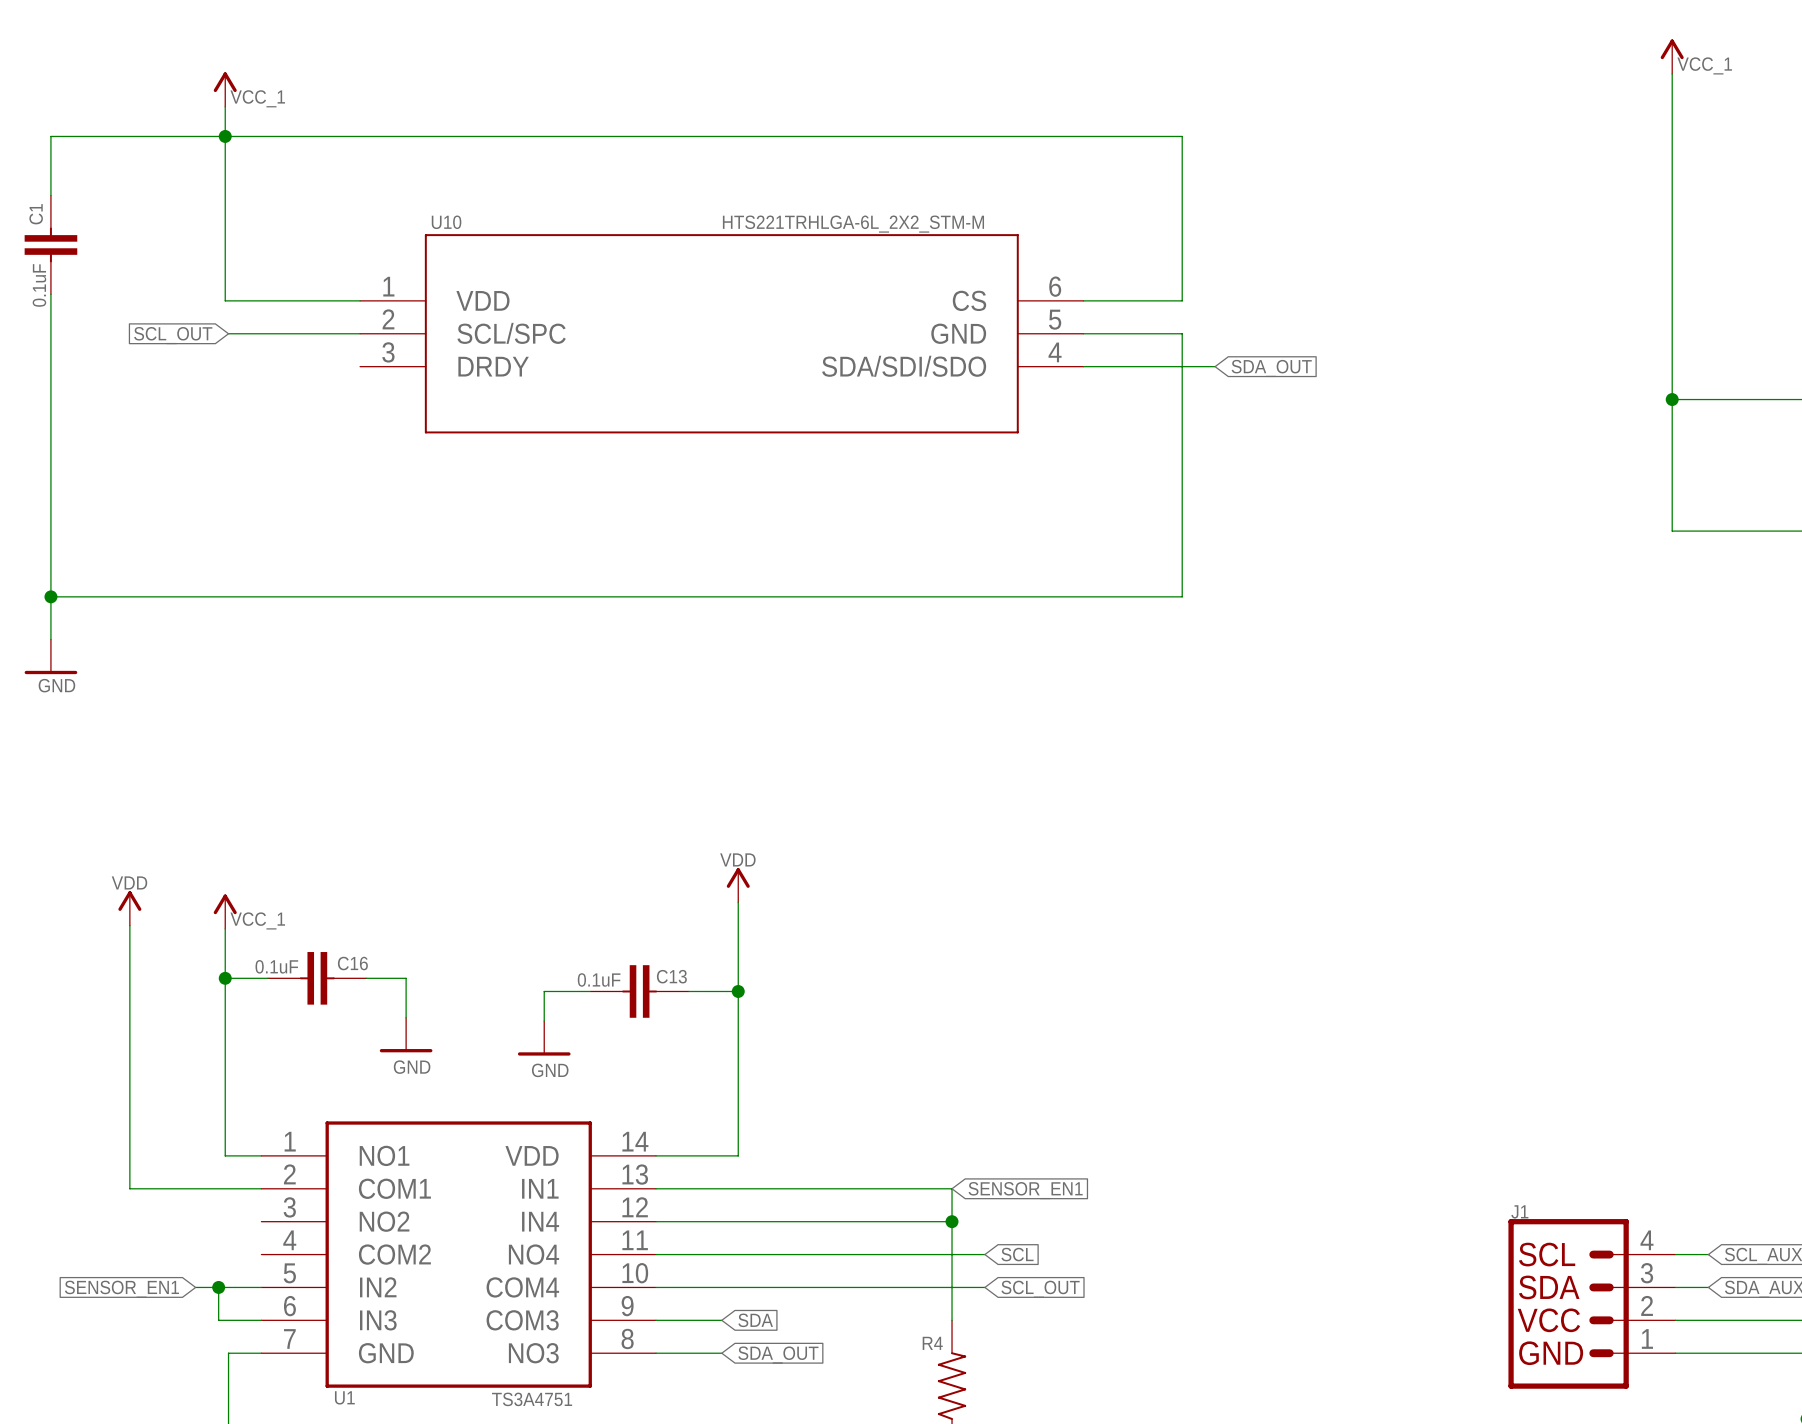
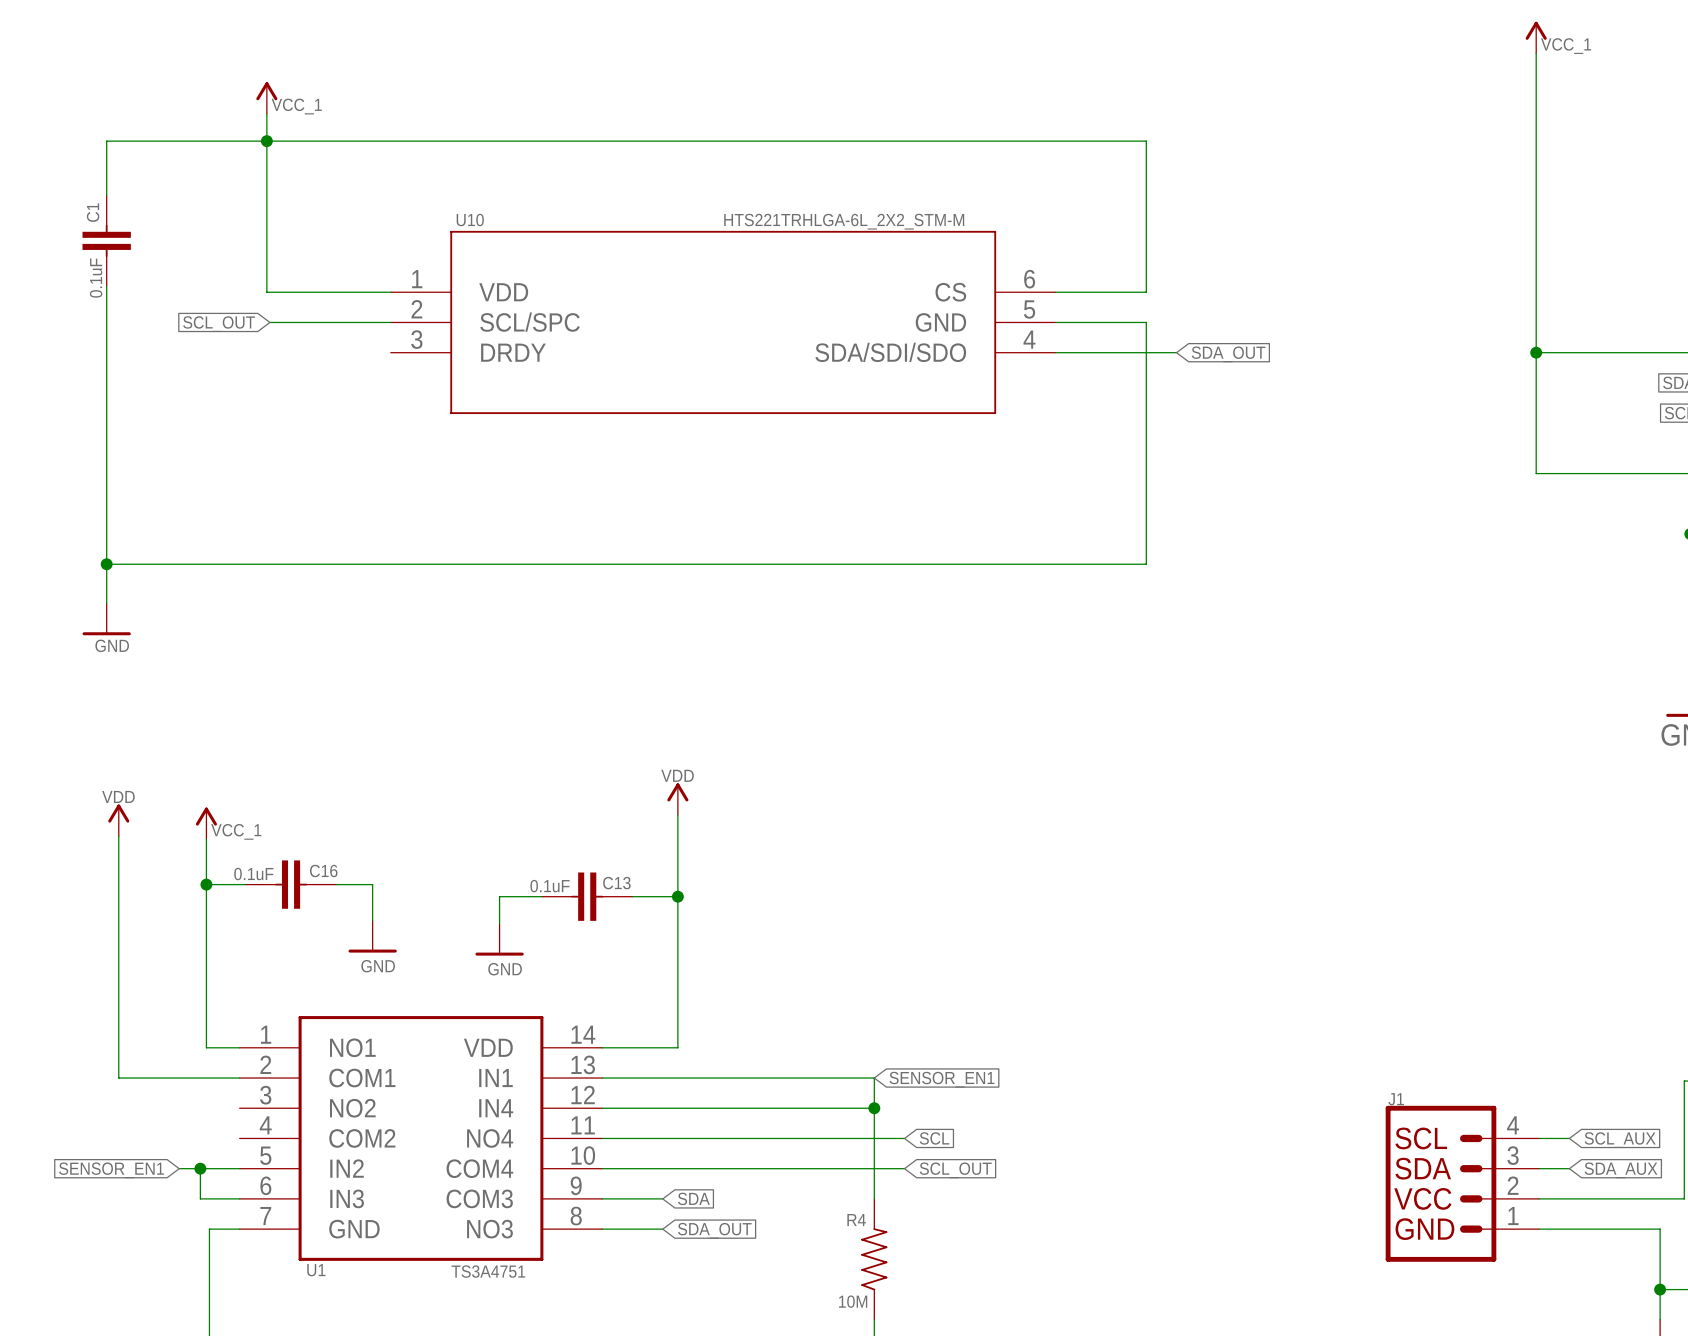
power symbol position: VCC_1 (225, 89) -> VCC_1 (266, 98)
wire: (225, 106) (225, 300) (360, 300) -> none
junction position: (225, 136) -> (266, 141)
wire: (50, 195) (50, 136) (1182, 136) (1182, 300) (1083, 300) -> none
C1 position: (50, 244) -> (106, 240)
wire: (50, 294) (50, 639) -> (106, 286) (106, 603)
wire: (228, 333) (291, 333) -> (266, 113) (266, 292)
U10 position: (721, 333) -> (723, 322)
wire: (1182, 333) (1182, 596) (50, 596) -> (1085, 292) (1146, 292) (1146, 141) (106, 141) (106, 195)
global label position: SCL_OUT (173, 335) -> SCL_OUT (219, 324)
wire: none -> (269, 322) (390, 322)
wire: none -> (1116, 322) (1146, 322) (1146, 564) (106, 564)
global label position: SDA_OUT (1271, 368) -> SDA_OUT (1228, 354)
wire: none -> (1055, 352) (1176, 352)
junction position: (50, 596) -> (106, 564)
power symbol position: GND (50, 656) -> GND (106, 619)

